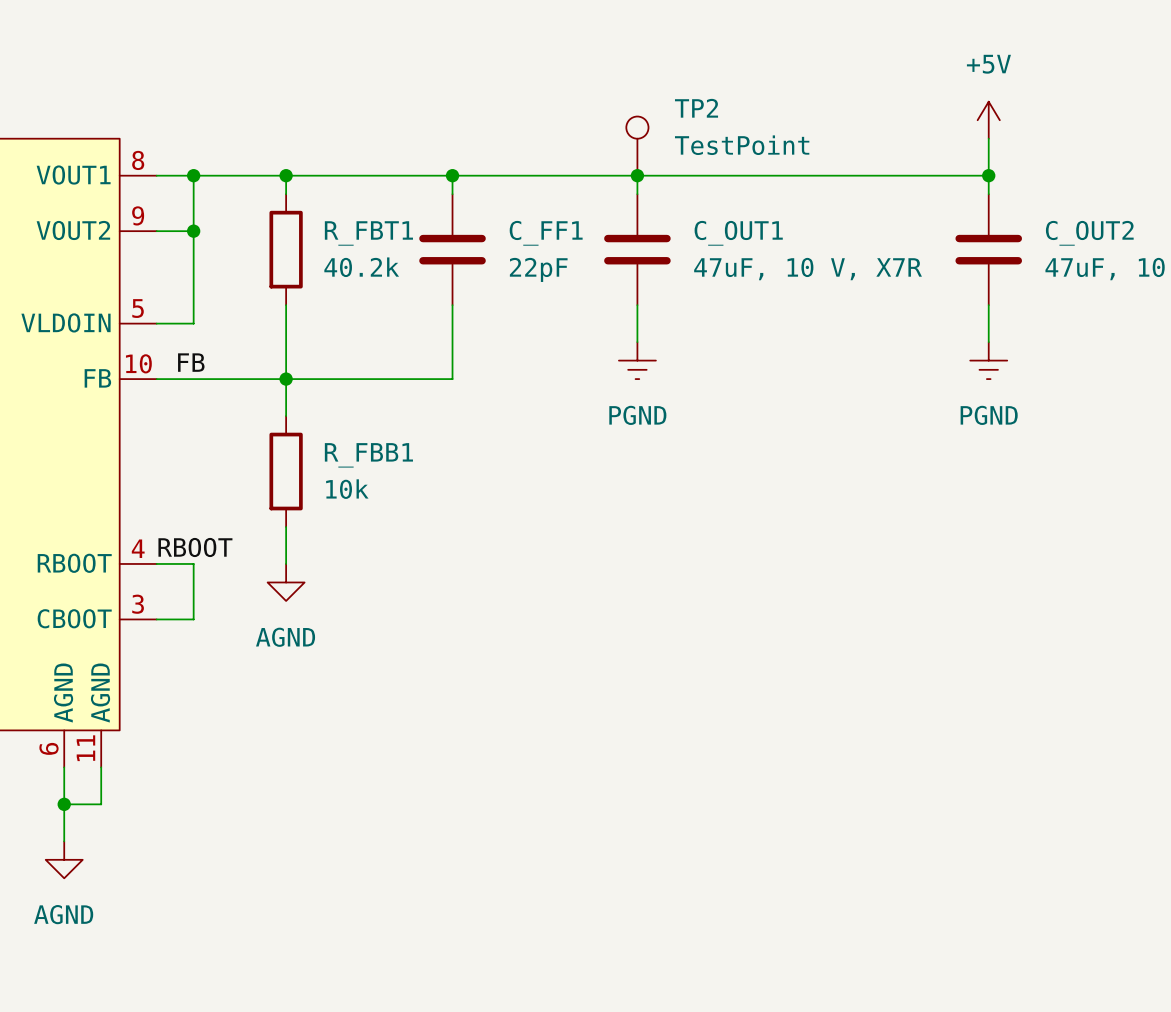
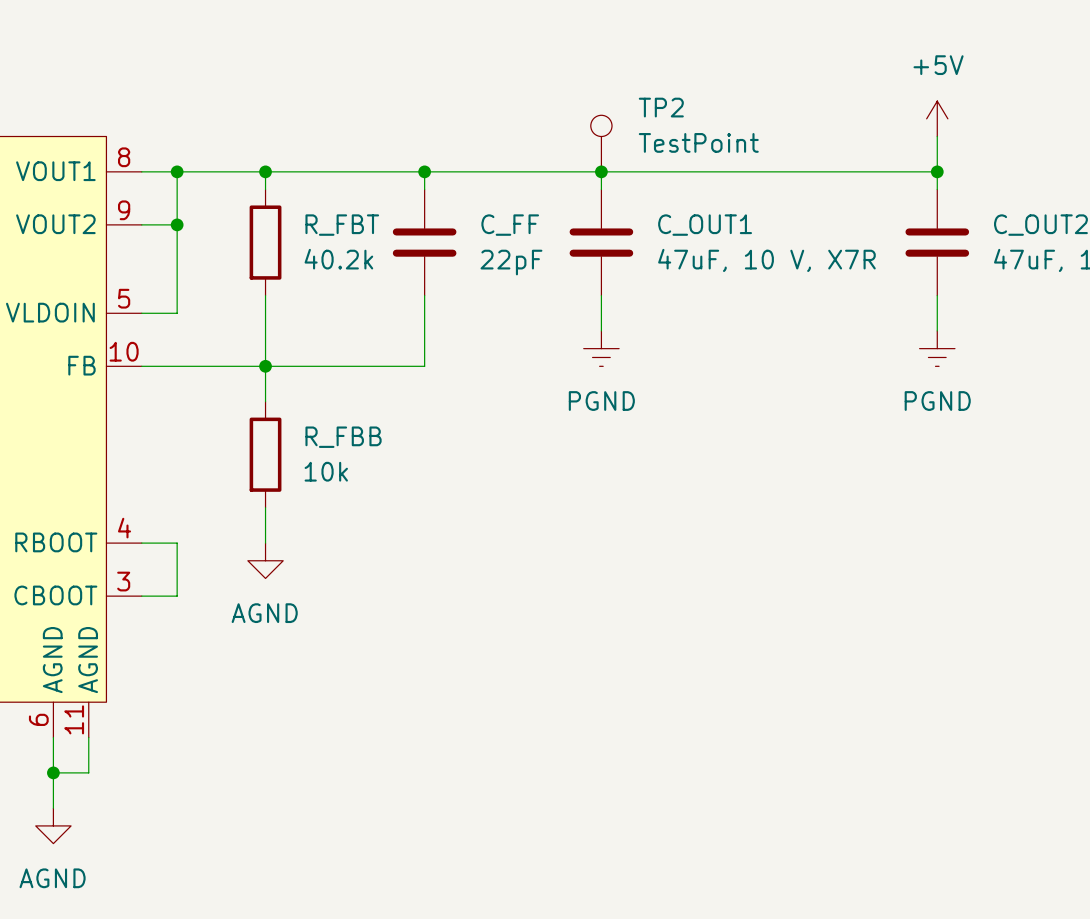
R_FBT1 name: R_FBT1 (368, 233) -> R_FBT (342, 225)
C_FF1 name: C_FF1 (546, 233) -> C_FF (510, 225)
label: FB (191, 362) -> none
R_FBB1 name: R_FBB1 (368, 455) -> R_FBB (343, 437)
label: RBOOT (195, 547) -> none

